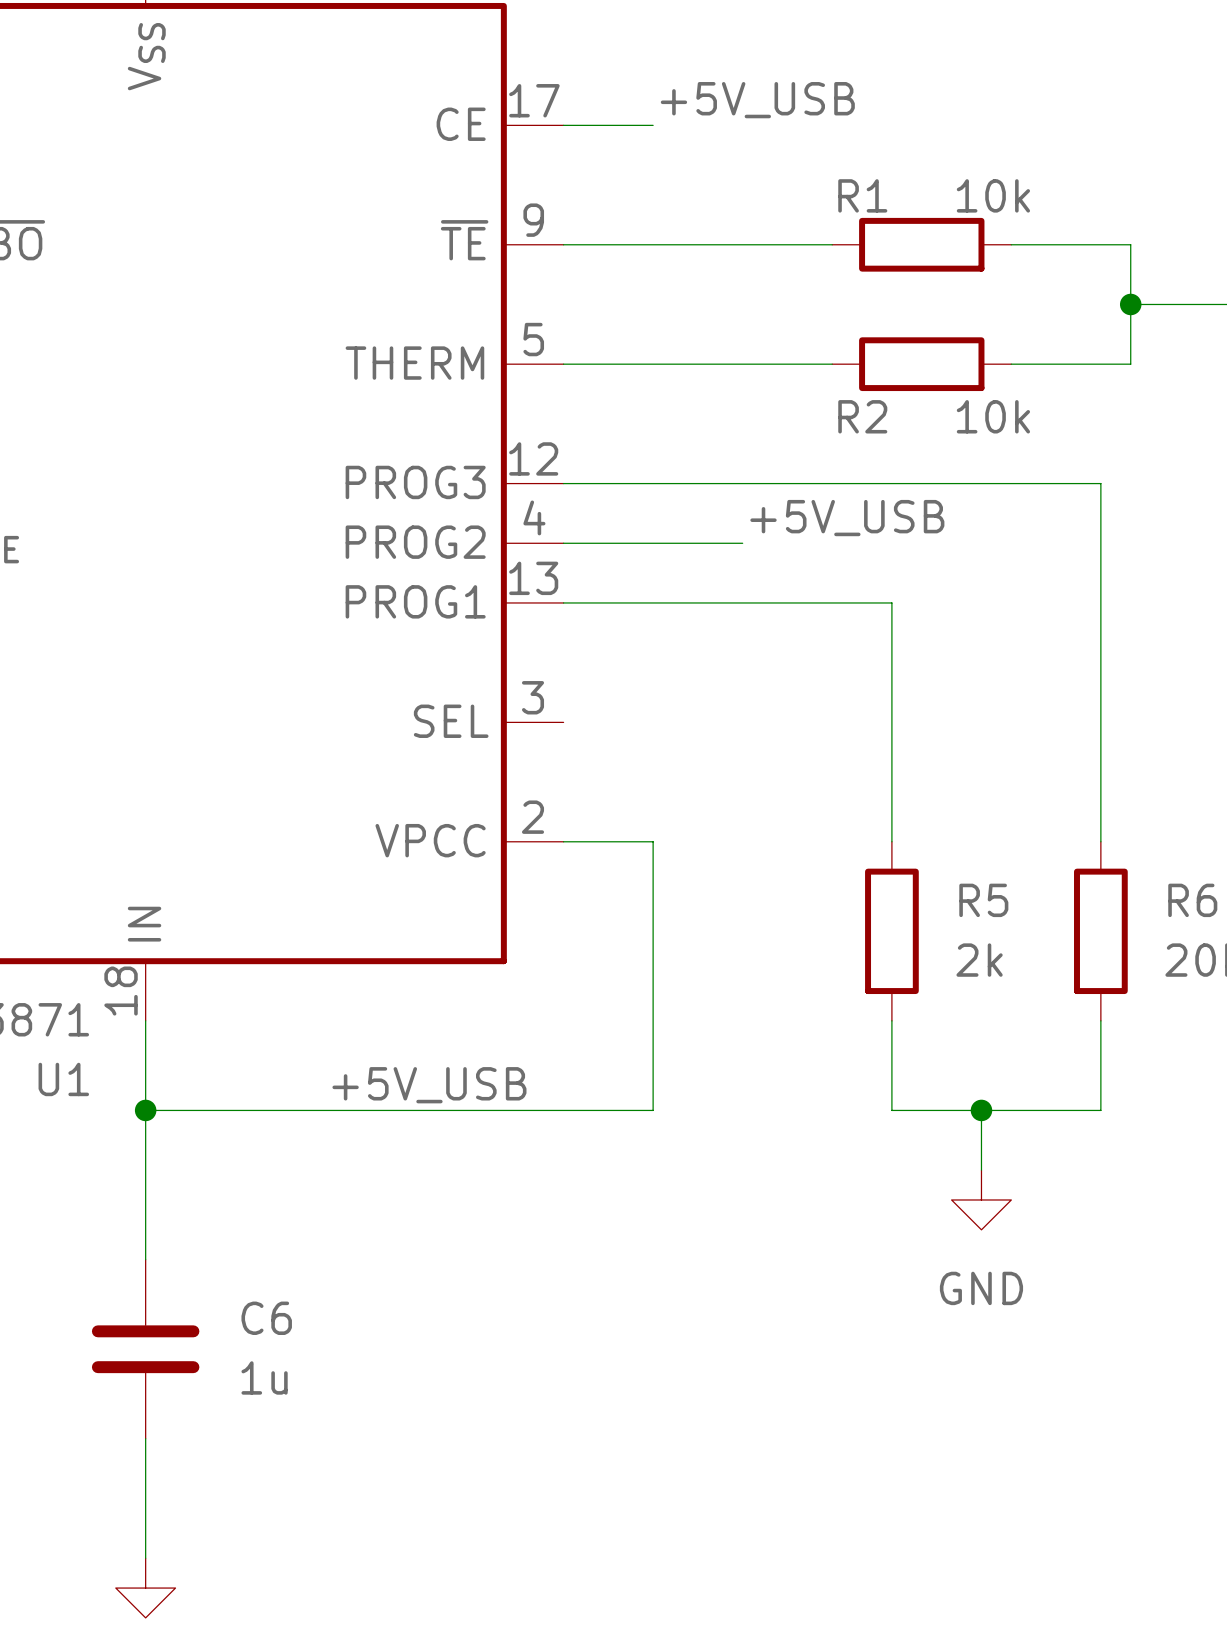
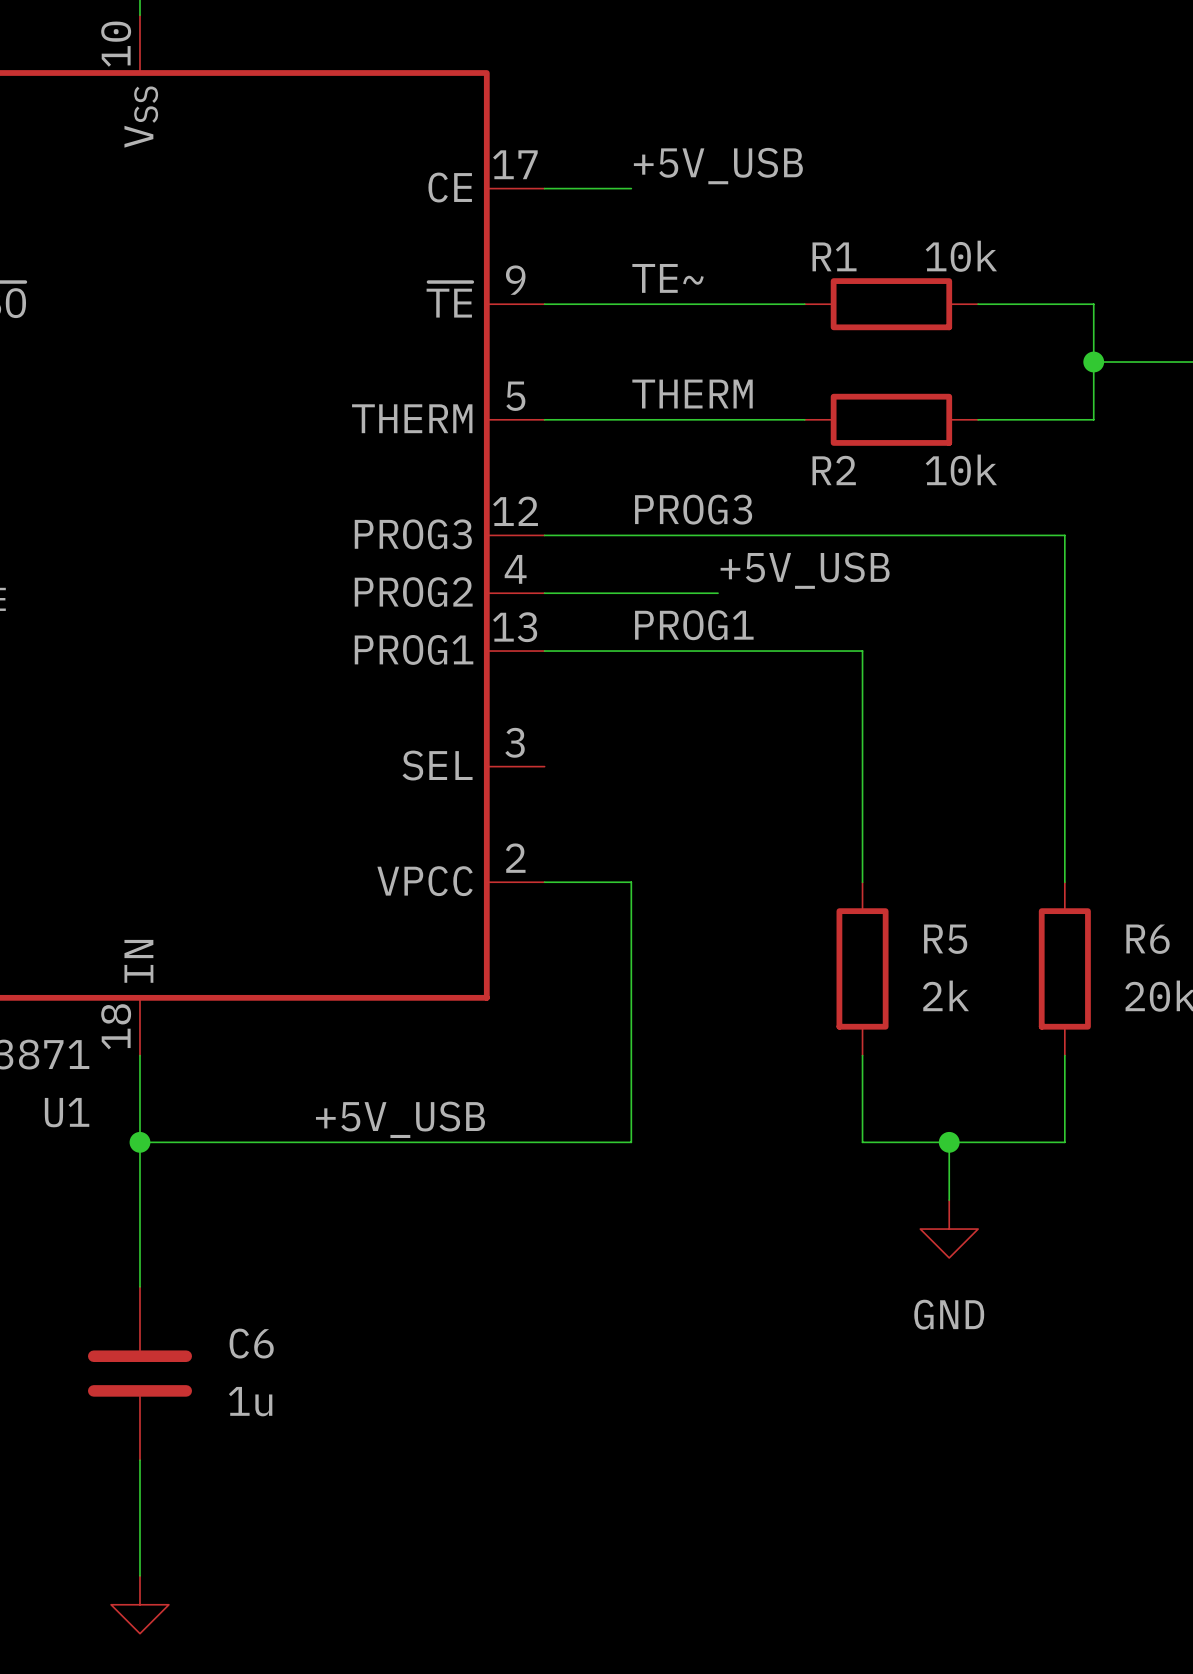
label: none -> TE~ (668, 278)
label: none -> THERM (692, 394)
label: none -> PROG3 (693, 509)
label: none -> PROG1 (694, 625)

